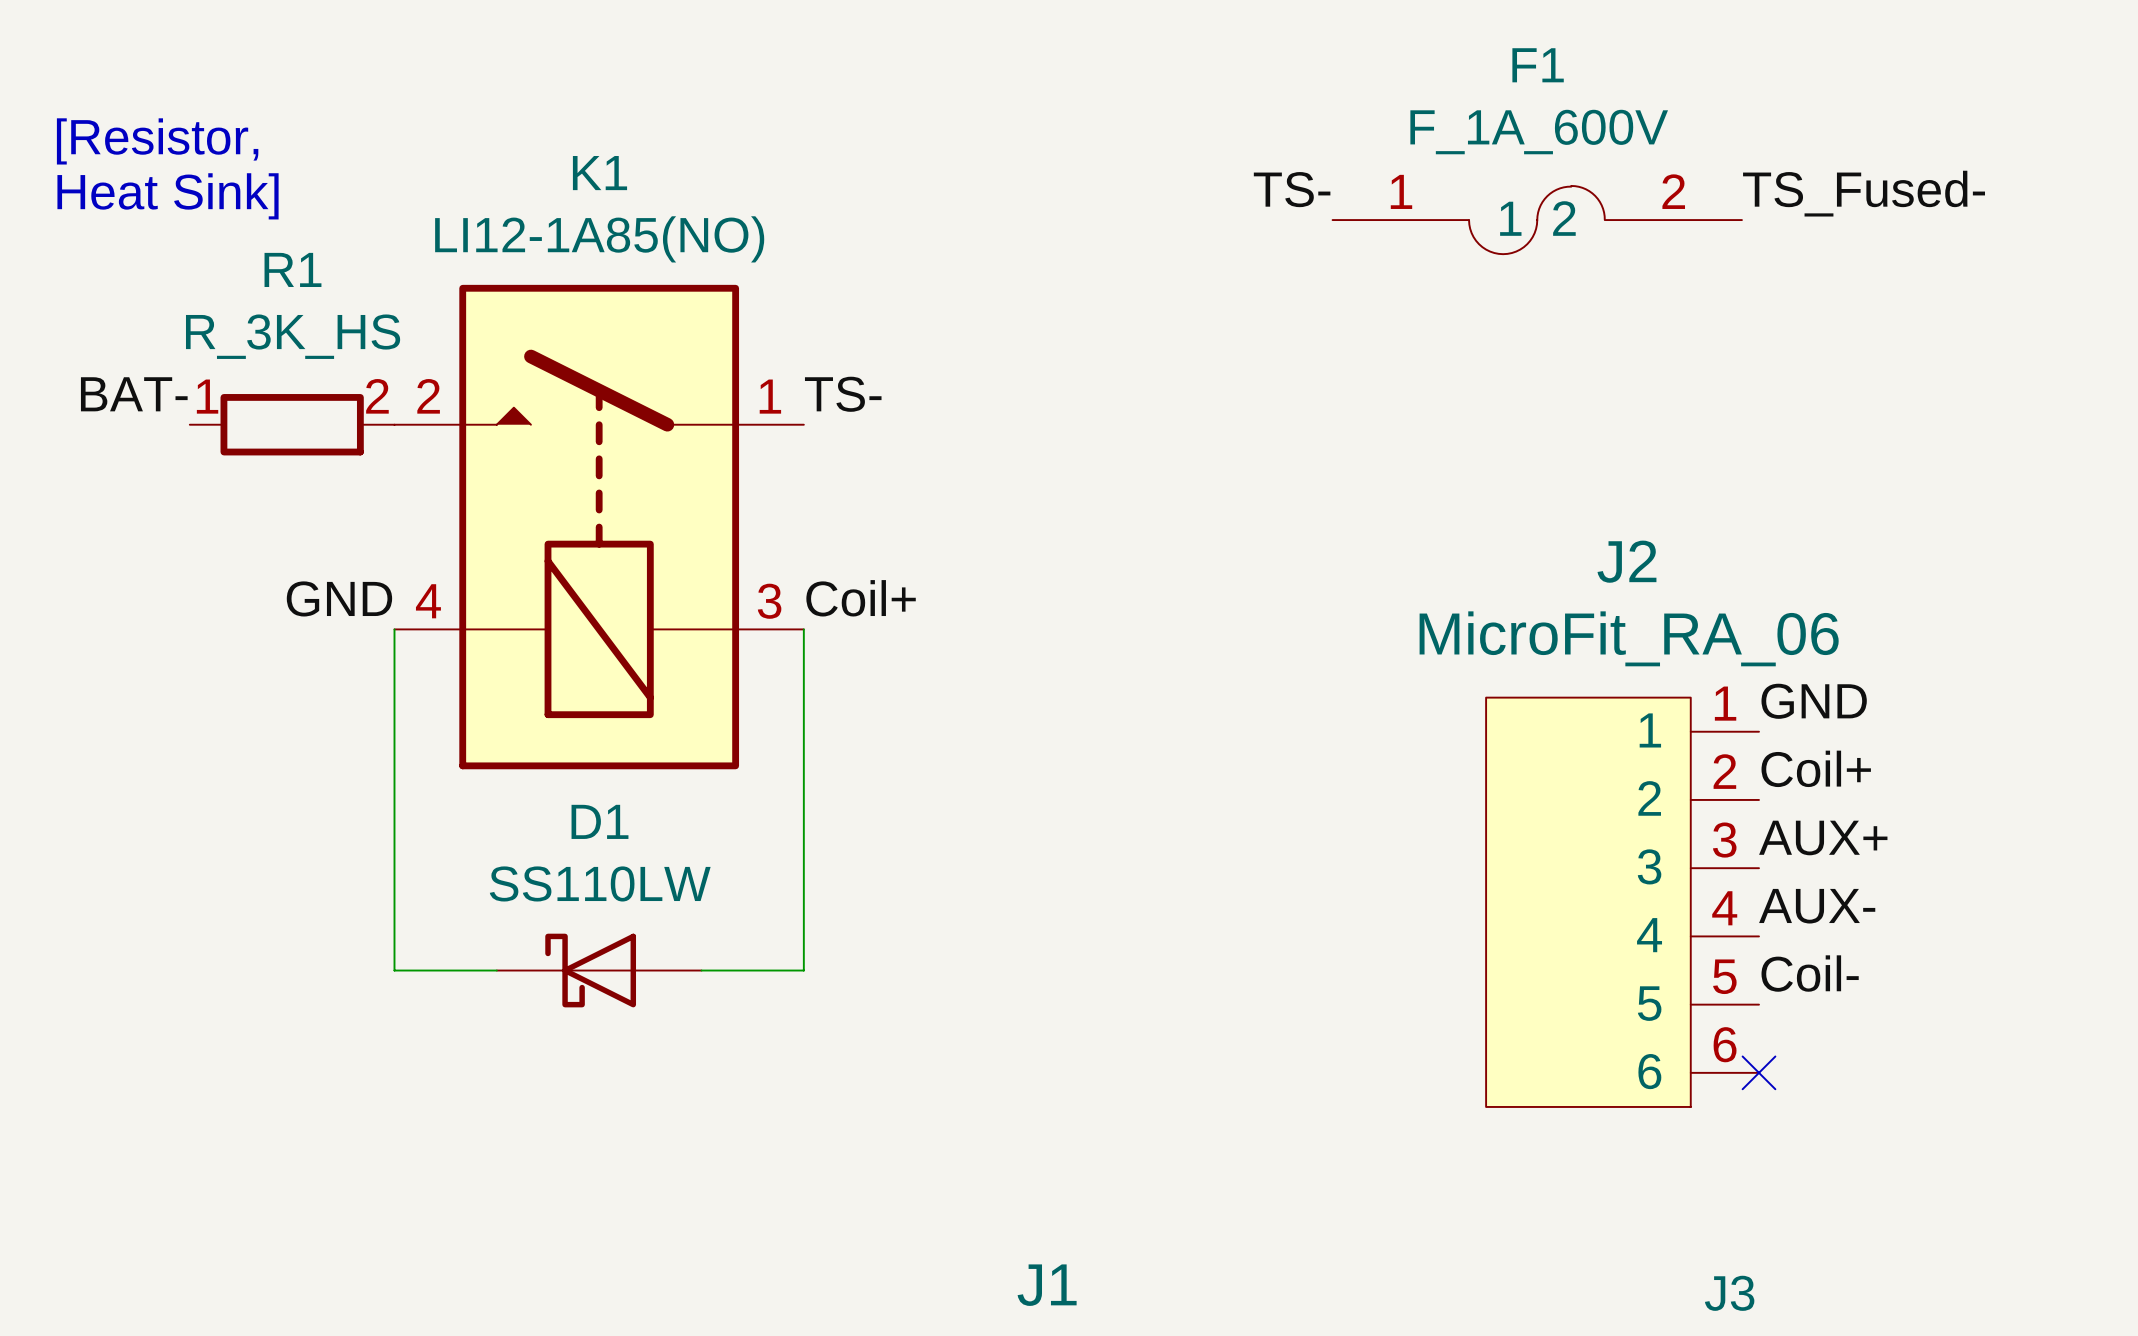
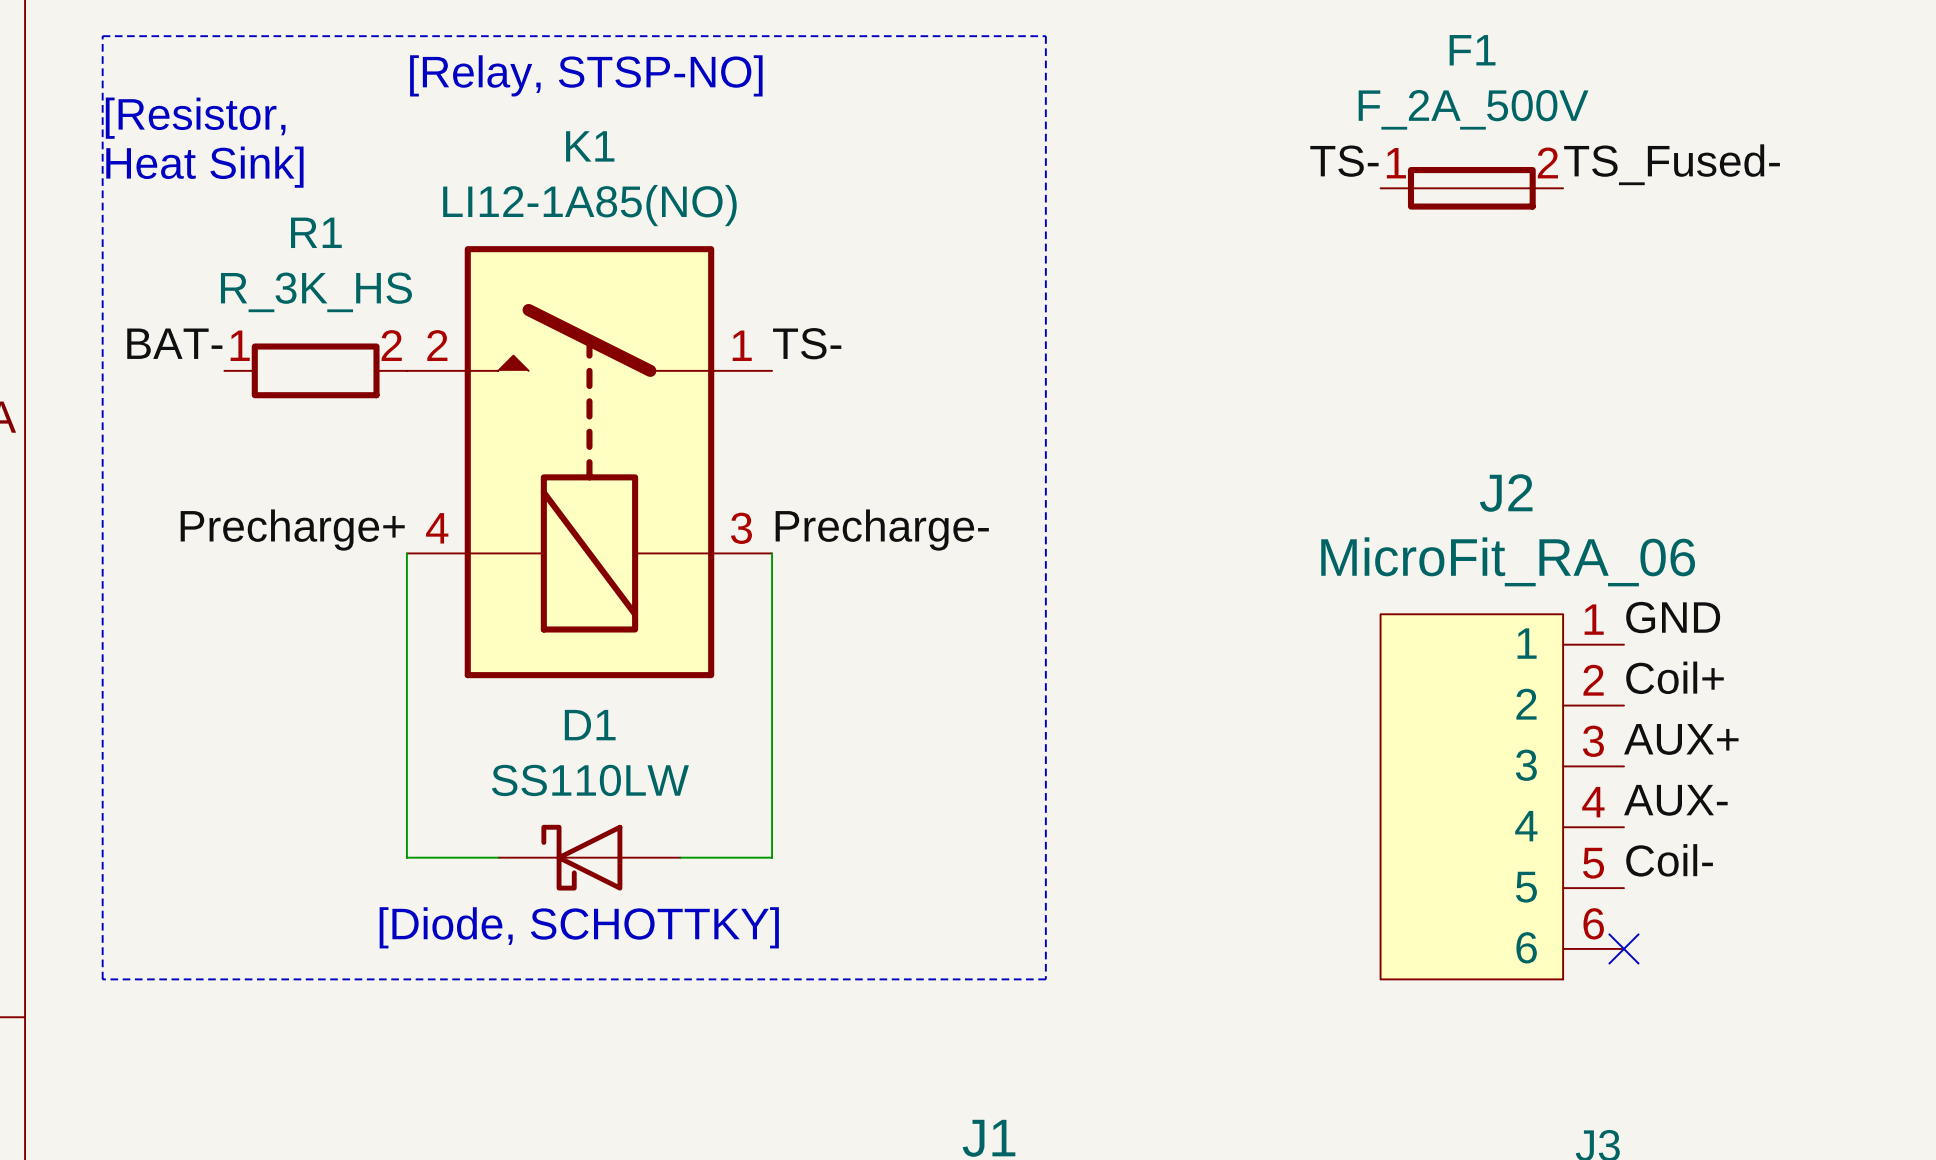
line: none -> (102, 36) (102, 979) (1045, 979) (1045, 36) (102, 36)
text: none -> [Relay, STSP-NO] (586, 75)
F1 value: F_1A_600V (1539, 132) -> F_2A_500V (1473, 109)
F1 symbol: [1332, 185, 1742, 255] -> [1380, 167, 1564, 210]
label position: TS- (1292, 189) -> TS- (1344, 161)
label position: TS_Fused- (1864, 193) -> TS_Fused- (1672, 164)
label: GND (339, 598) -> Precharge+ (292, 530)
label: Coil+ (861, 598) -> Precharge- (882, 530)
text: none -> [Diode, SCHOTTKY] (579, 927)

